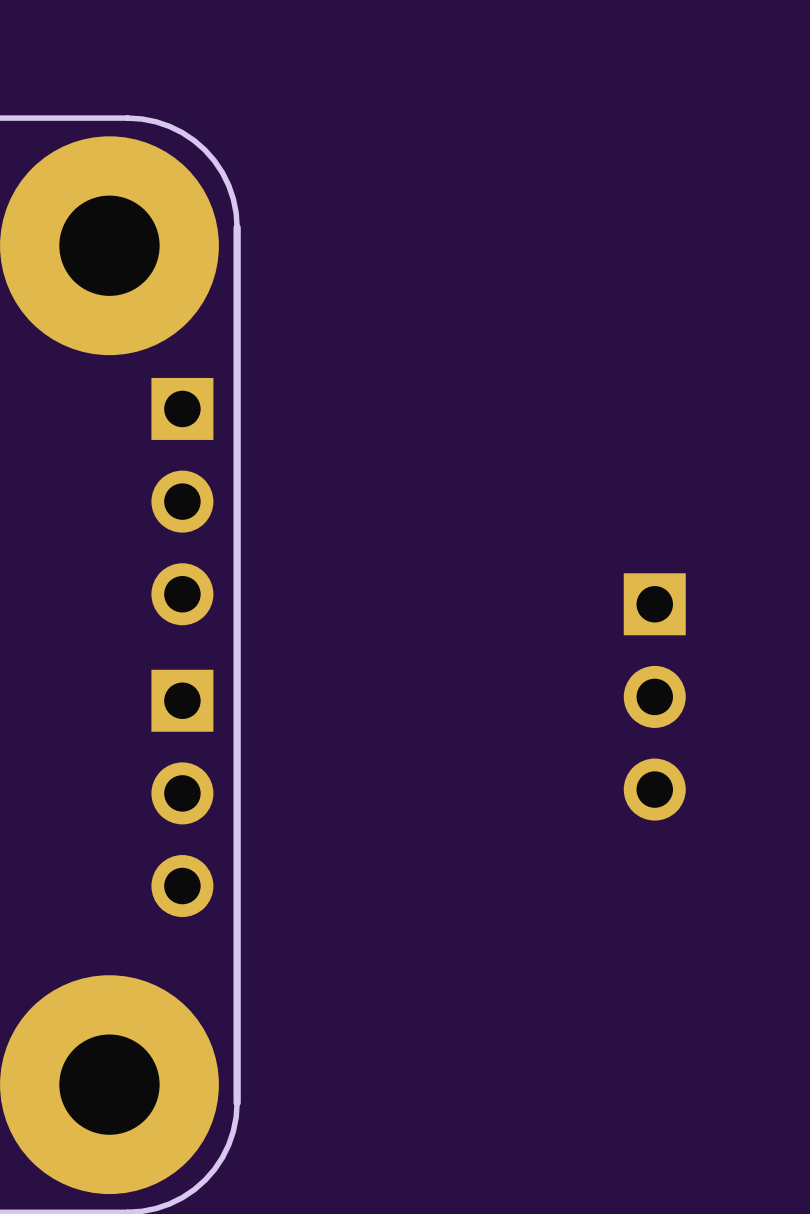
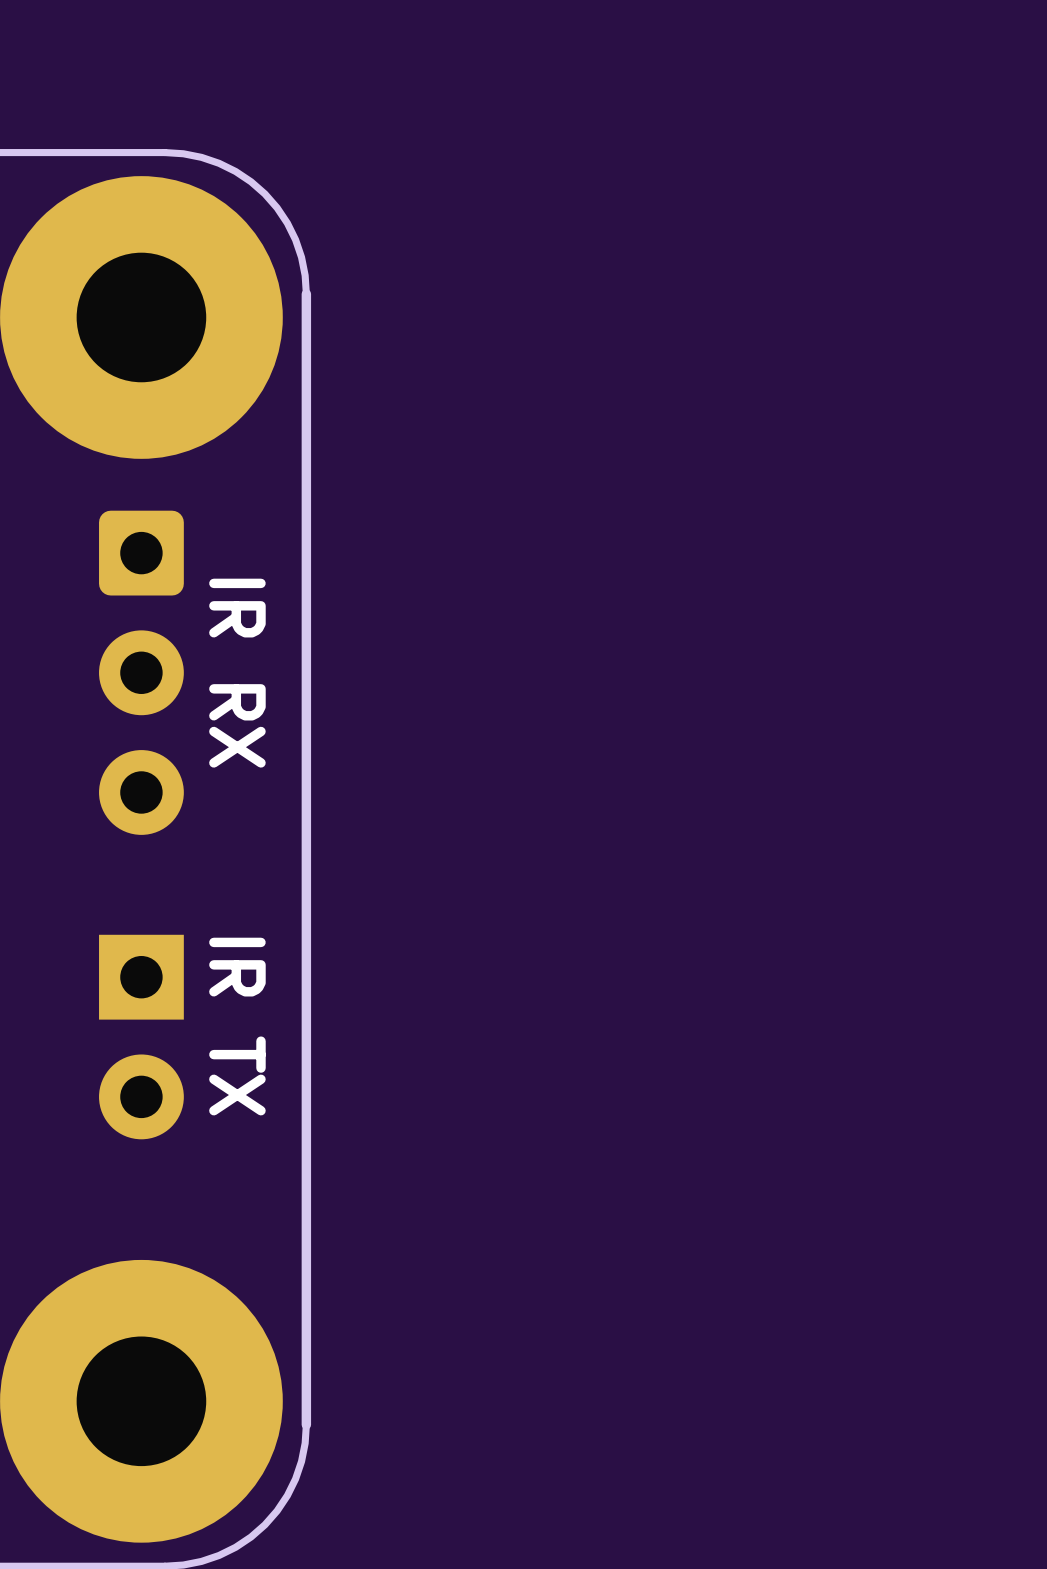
part: (182, 501) -> none
part: none -> (141, 672)
text: none -> IR RX (237, 673)
part: (654, 696) -> none
part: (182, 793) -> none
text: none -> IR TX (237, 1026)
part: none -> (141, 1037)

